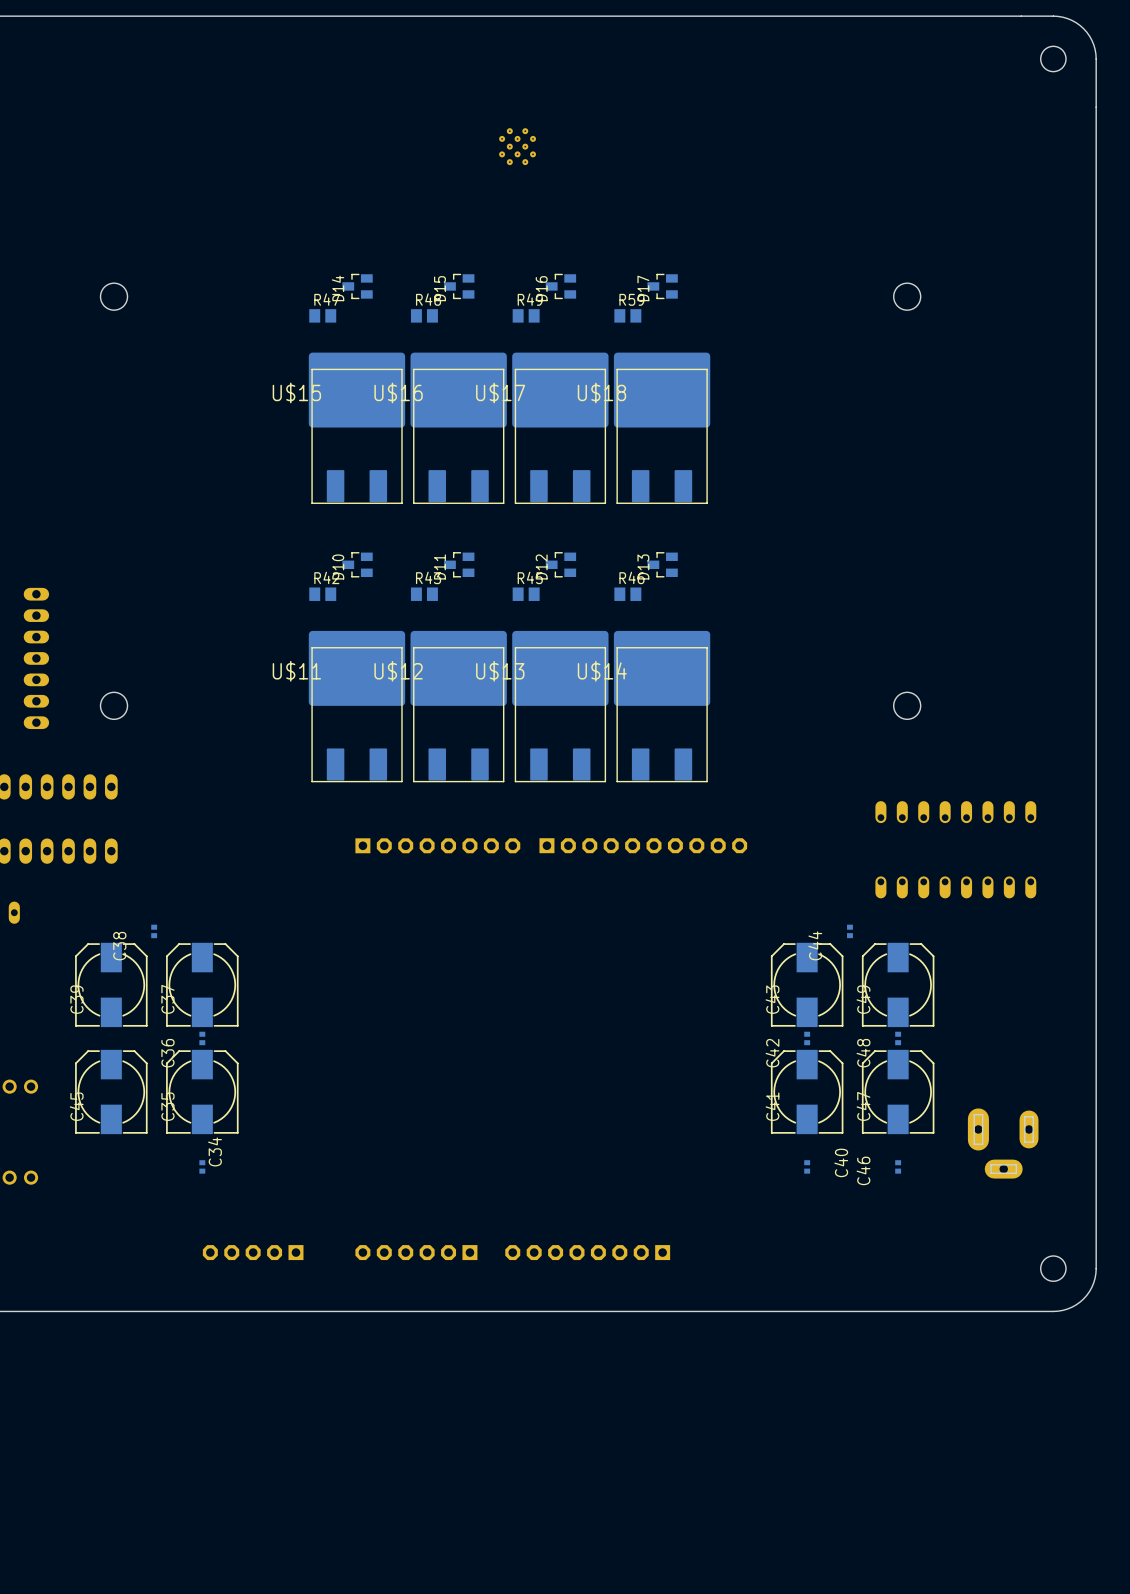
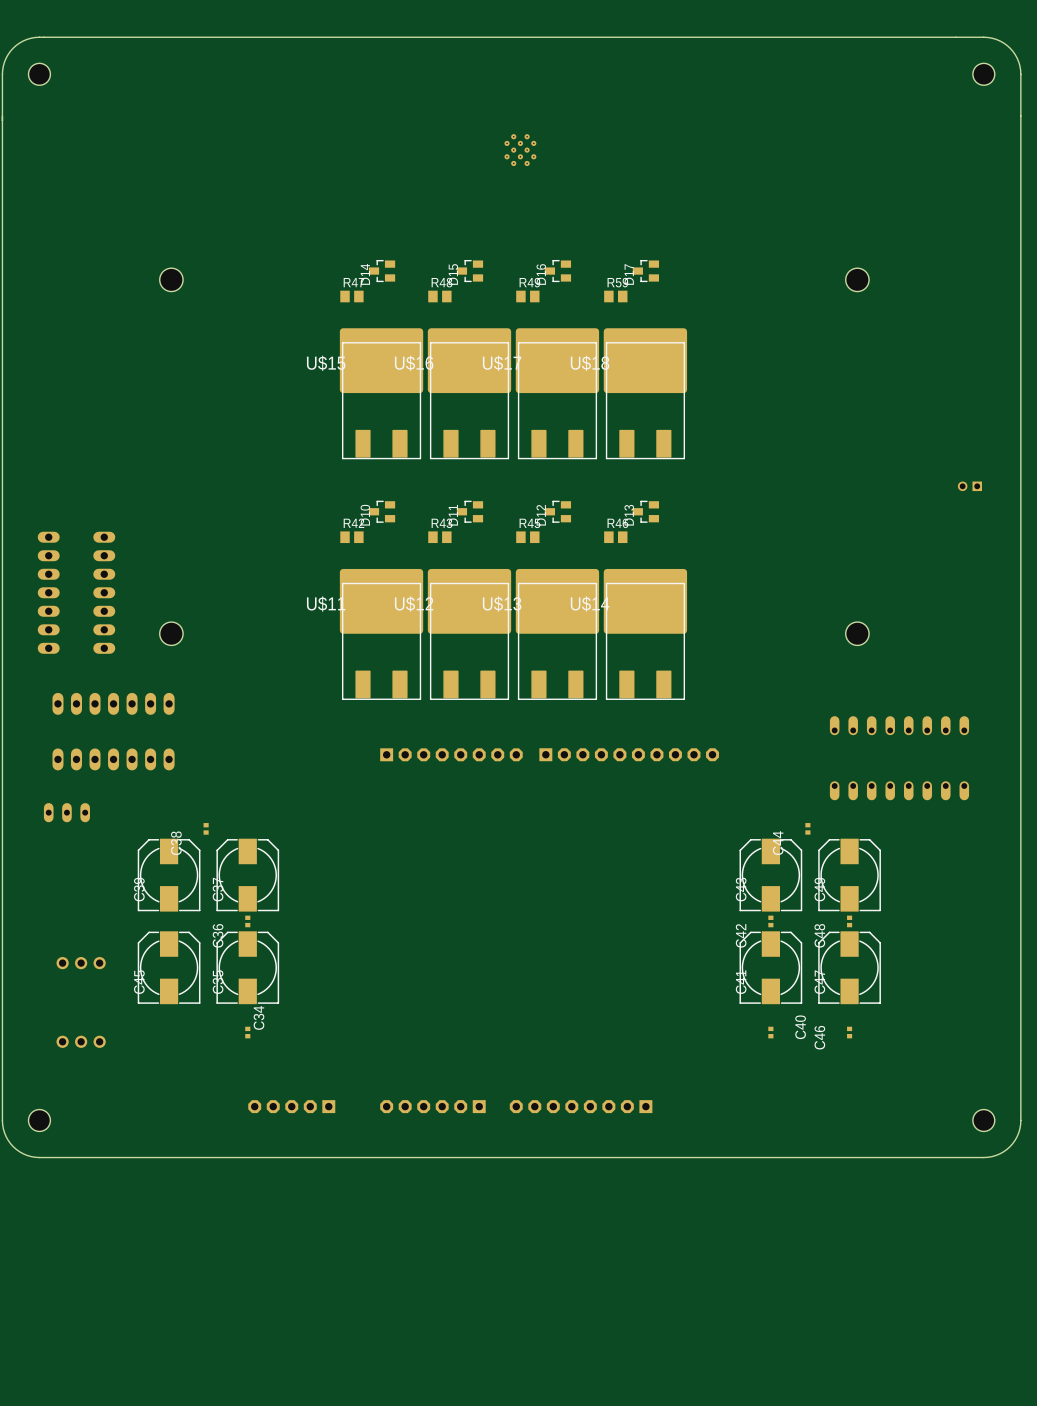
part: none -> (969, 486)
part: (1003, 1143) -> none

